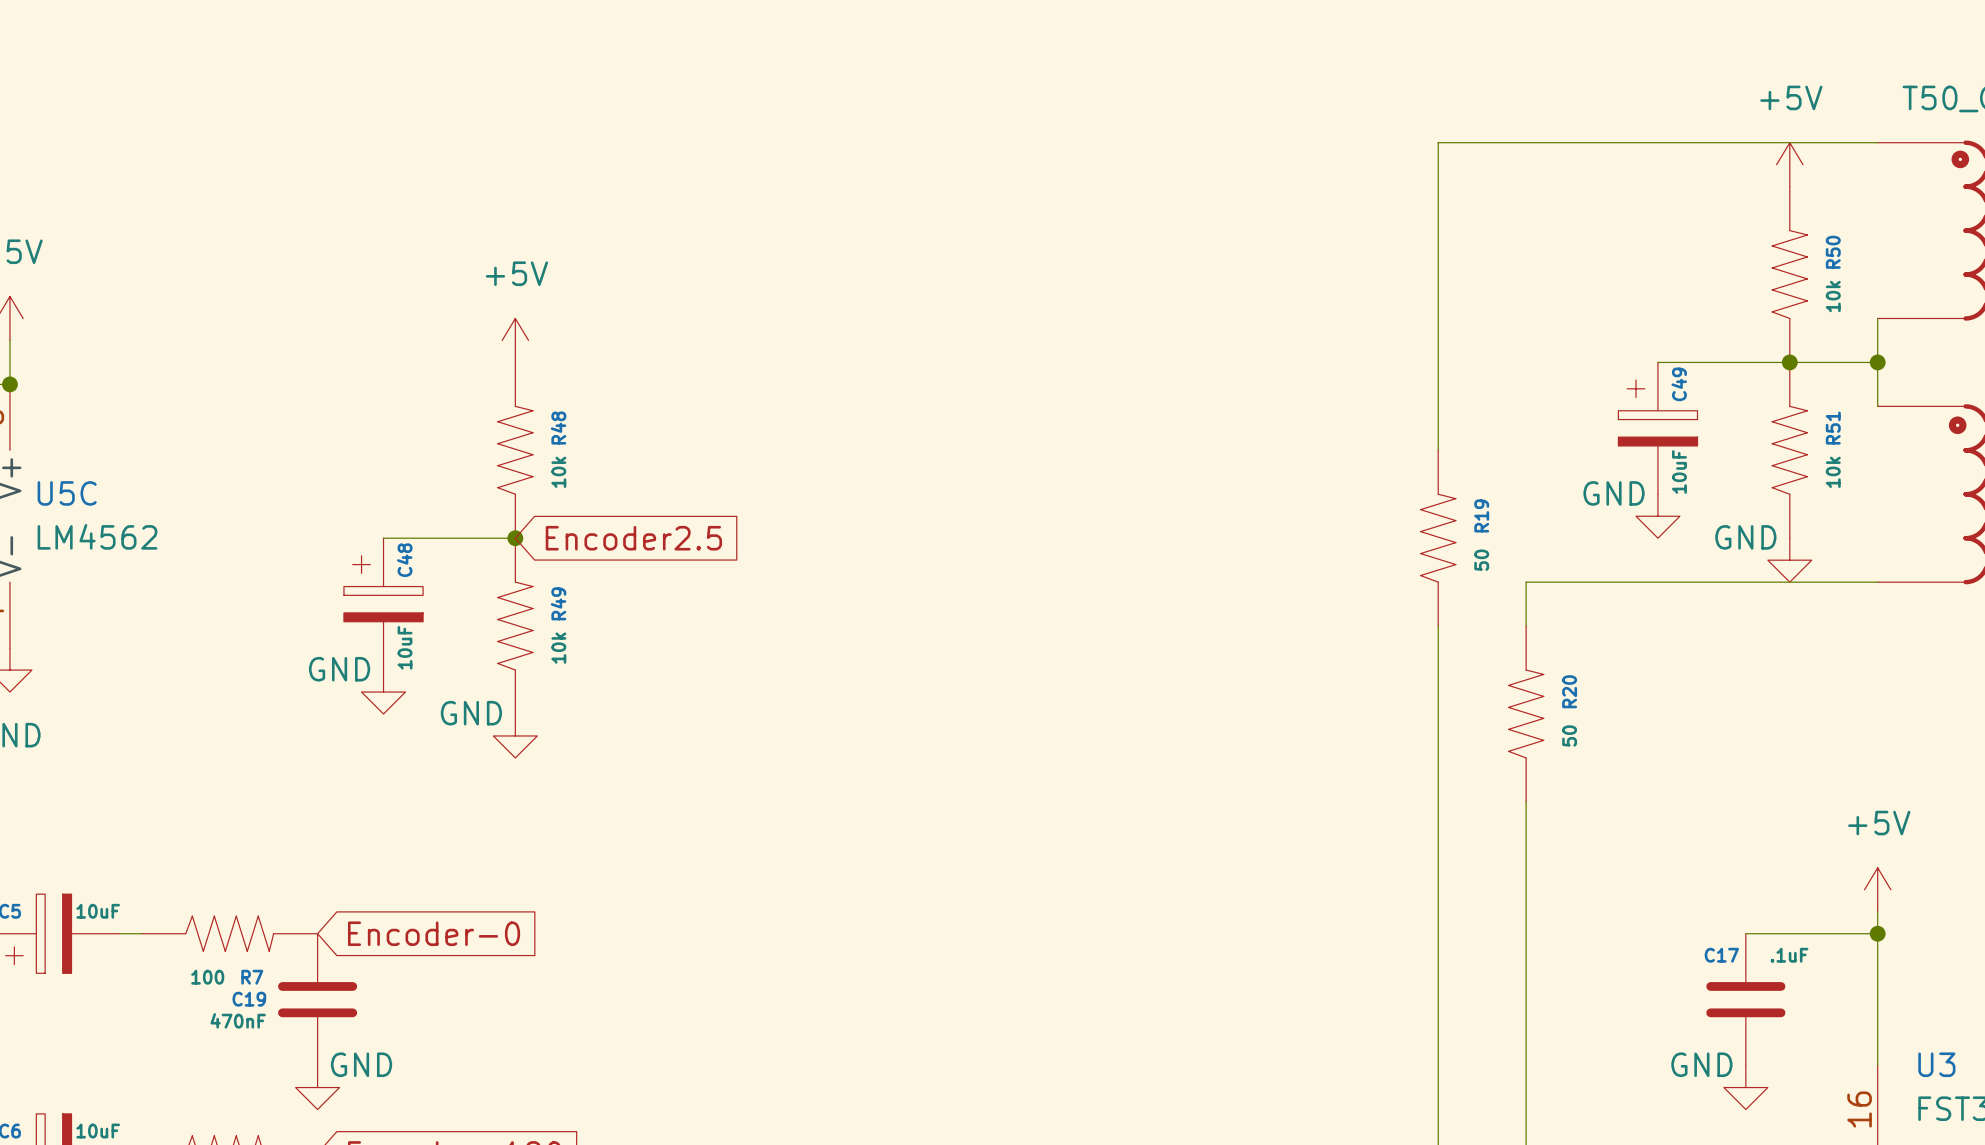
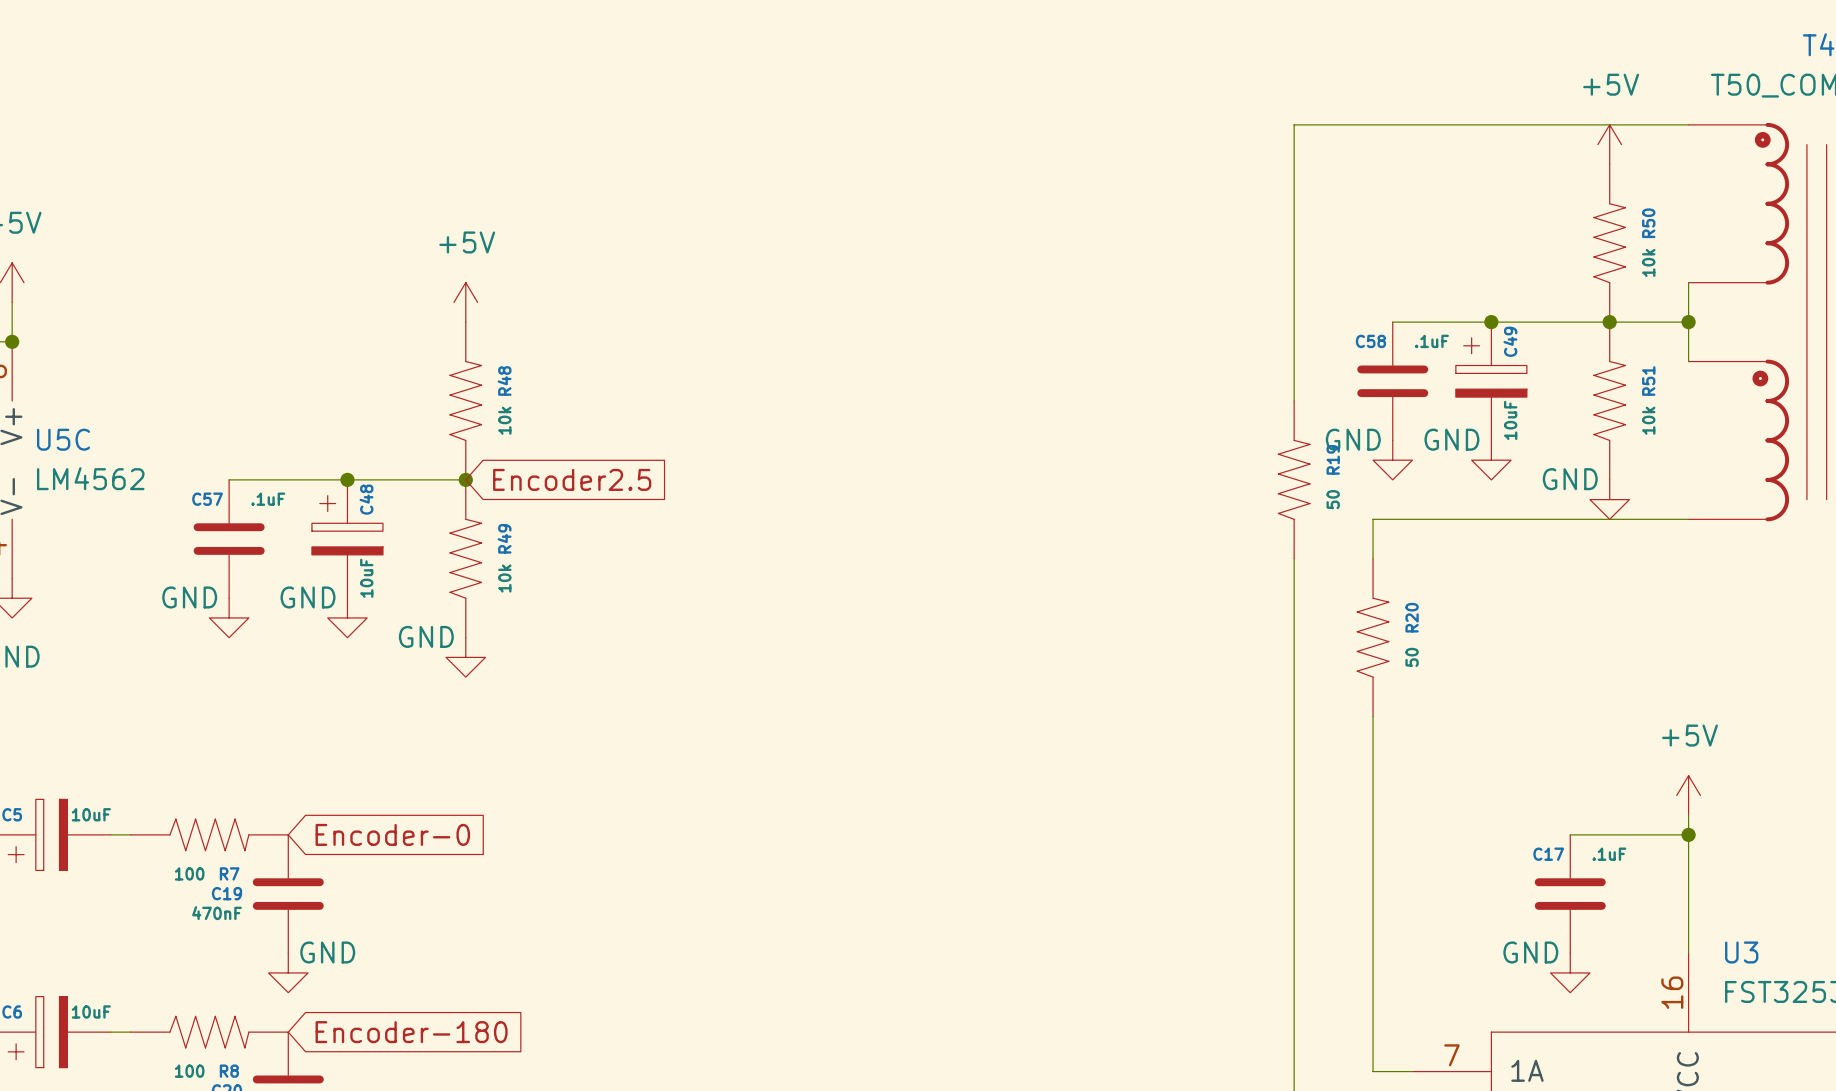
wire: none -> (1392, 322) (1491, 322)
junction: none -> (1491, 322)
C58: none -> .1uF (1392, 381)
power symbol: none -> GND (1392, 460)
wire: none -> (229, 479) (347, 479)
junction: none -> (347, 479)
C57: none -> .1uF (229, 539)
power symbol: none -> GND (229, 617)

